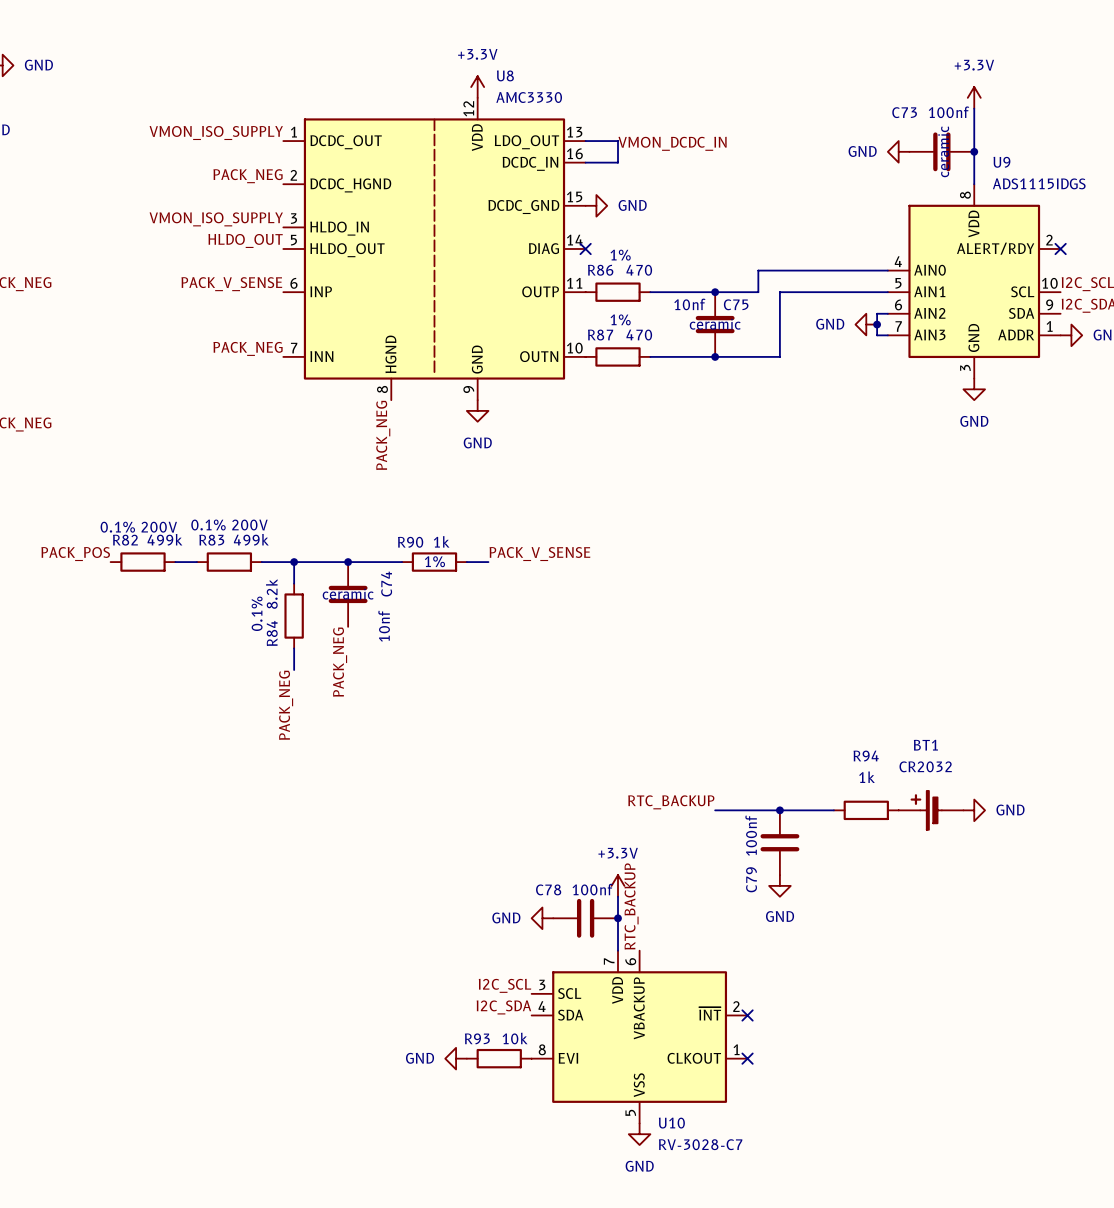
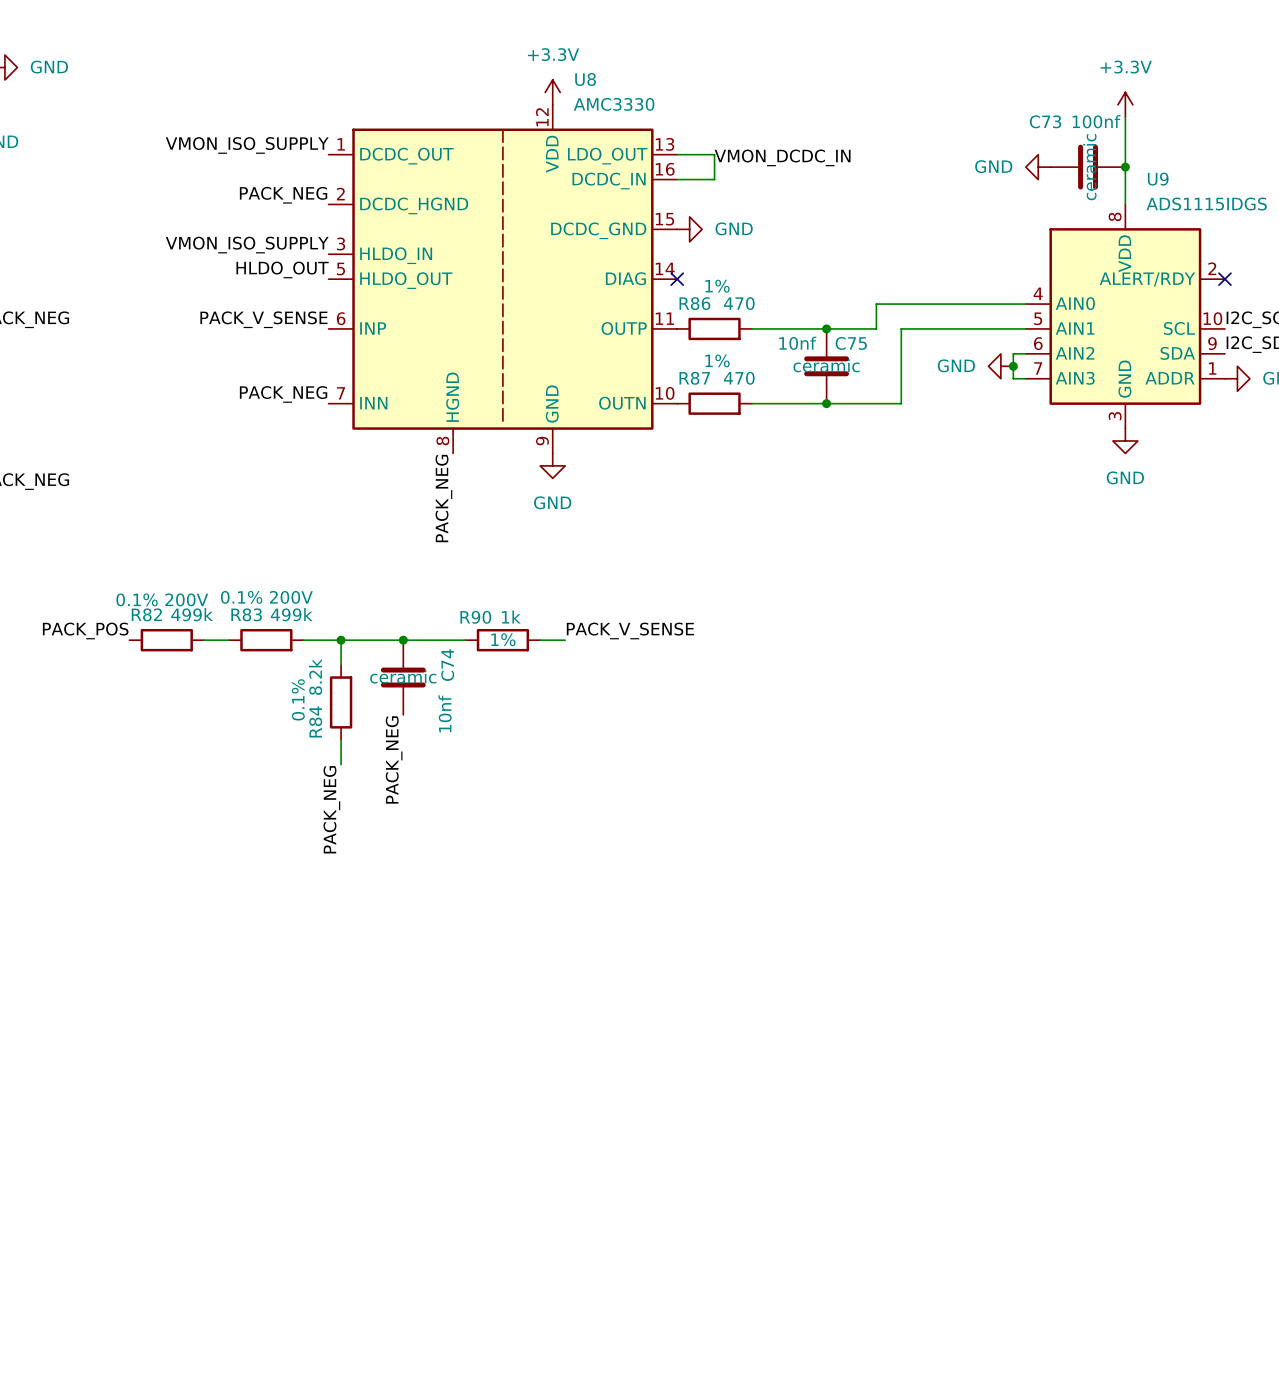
label: RTC_BACKUP (671, 802) -> none
wire: (715, 810) (833, 810) -> none
junction: (779, 810) -> none
R94: 1k (866, 810) -> none
BT1: CR2032 (931, 810) -> none
power symbol: GND (974, 810) -> none
C79: 100nf (779, 842) -> none
power symbol: +3.3V (618, 885) -> none
power symbol: GND (779, 885) -> none
wire: (618, 896) (618, 950) -> none
label: RTC_BACKUP (631, 906) -> none
power symbol: GND (542, 918) -> none
C78: 100nf (585, 918) -> none
junction: (618, 918) -> none
label: I2C_SCL (505, 985) -> none
label: I2C_SDA (503, 1007) -> none
no-connect mark: (747, 1015) -> none
U10: RV-3028-C7 (639, 1037) -> none
power symbol: GND (456, 1058) -> none
R93: 10k (499, 1058) -> none
no-connect mark: (747, 1058) -> none
power symbol: GND (639, 1134) -> none

